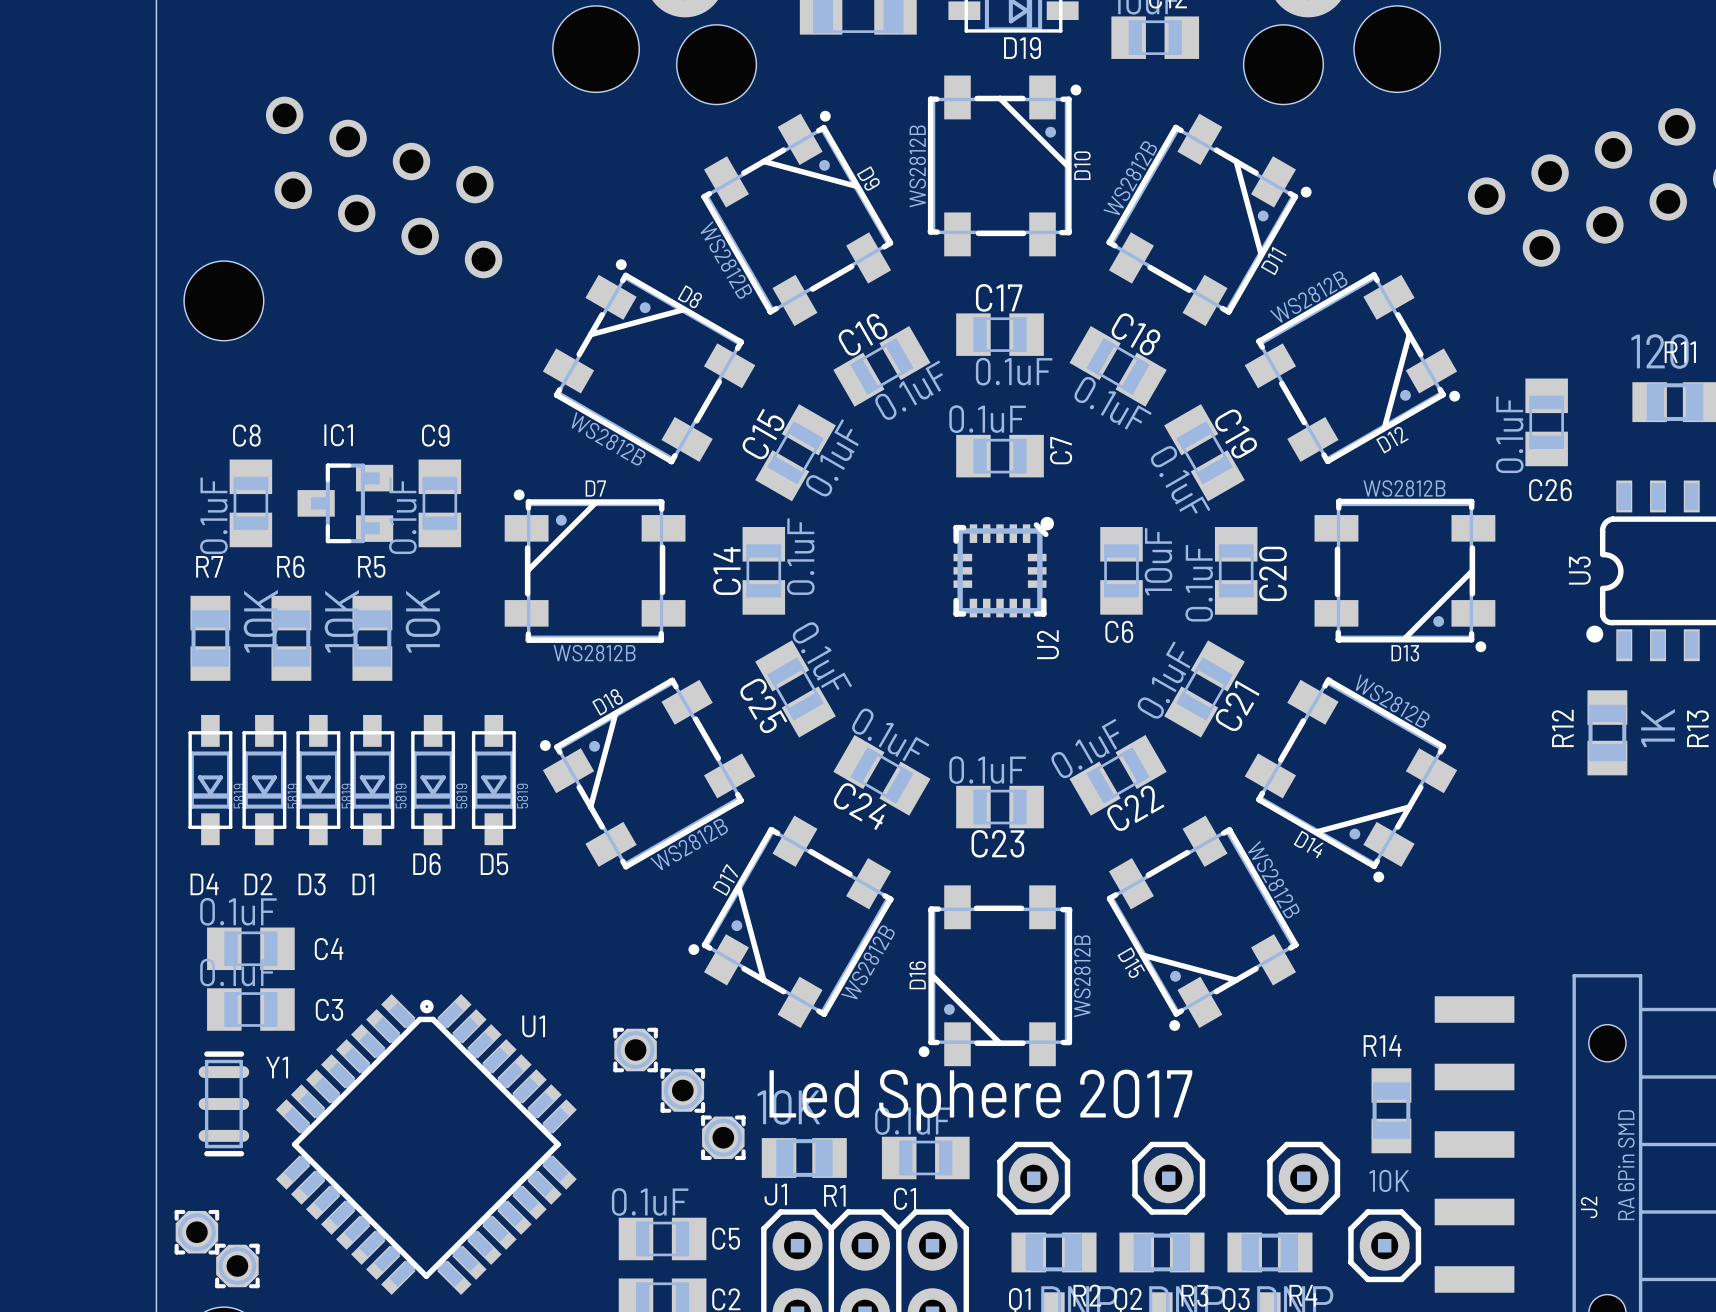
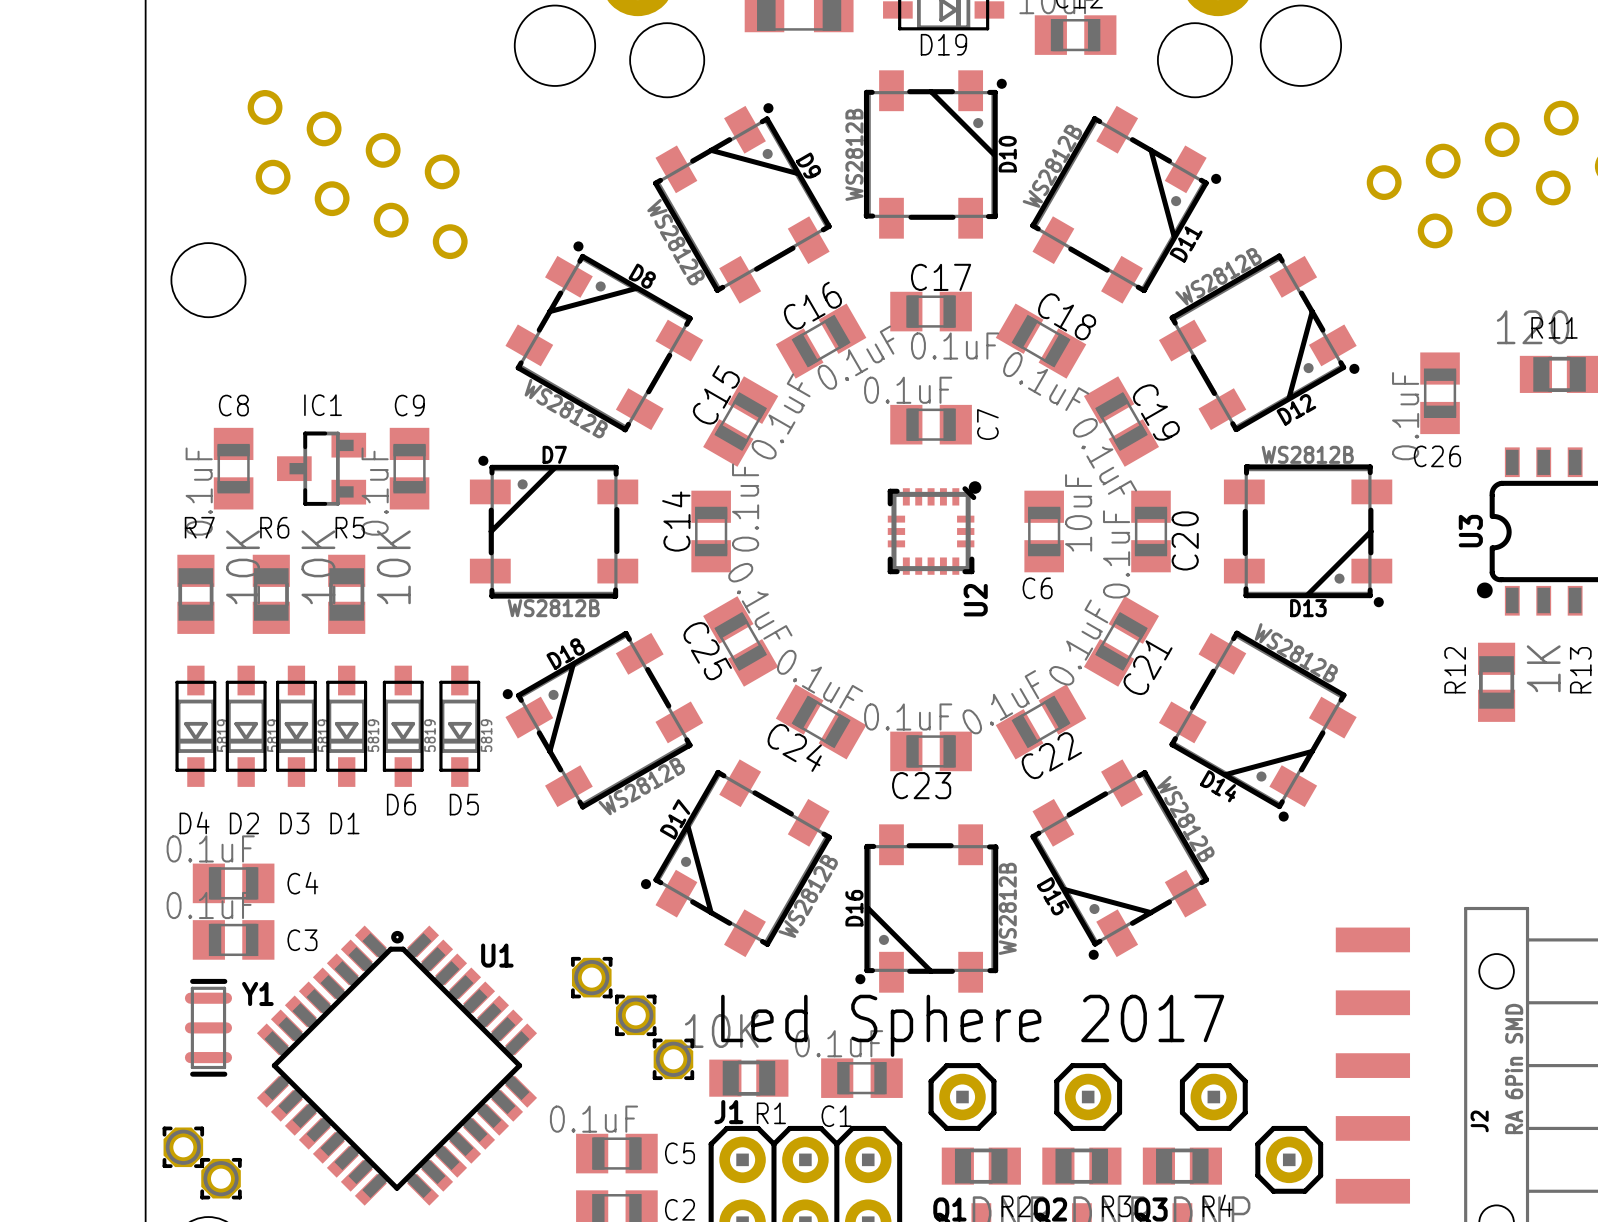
R14: 10K (1391, 1110) -> none

